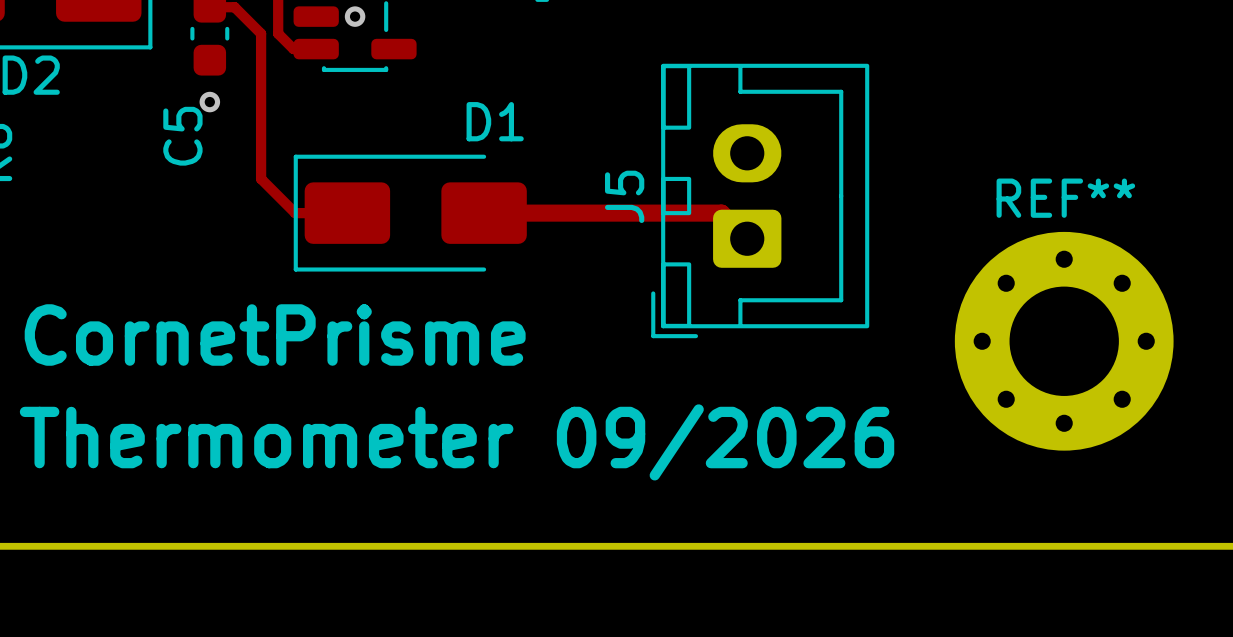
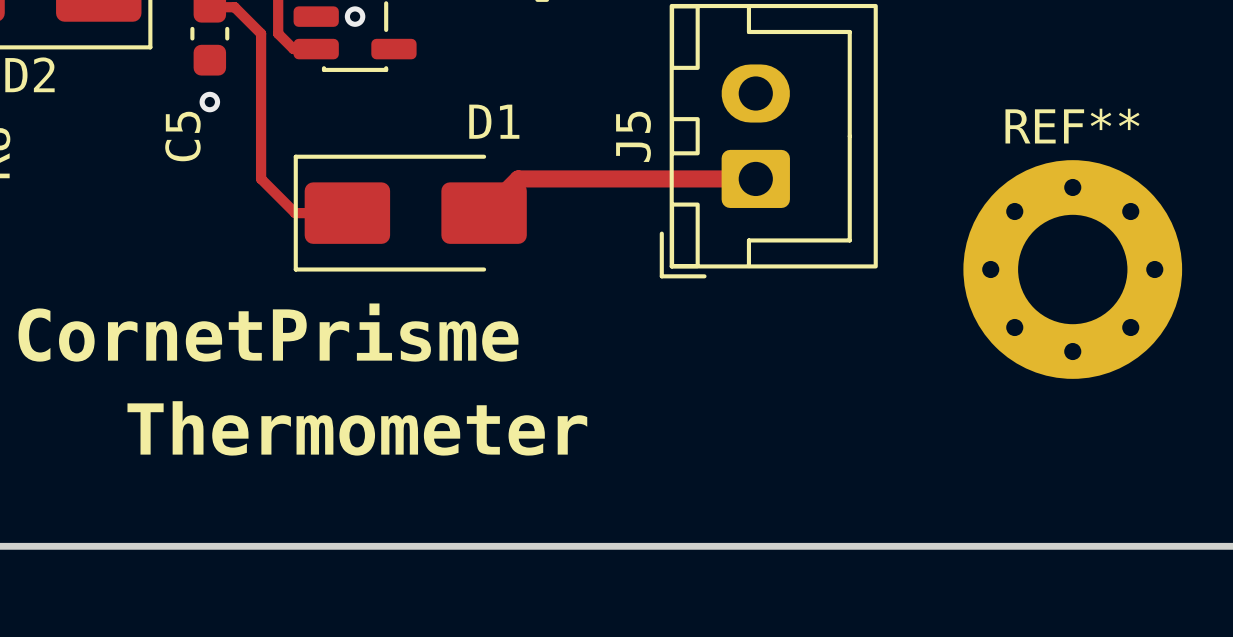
J5 position: (760, 200) -> (768, 141)
track: (484, 213) (721, 213) (747, 238) -> (484, 213) (518, 178) (755, 178)
REF** position: (1064, 341) -> (1072, 269)
text: Thermometer 09/2026 (457, 442) -> Thermometer (357, 428)

